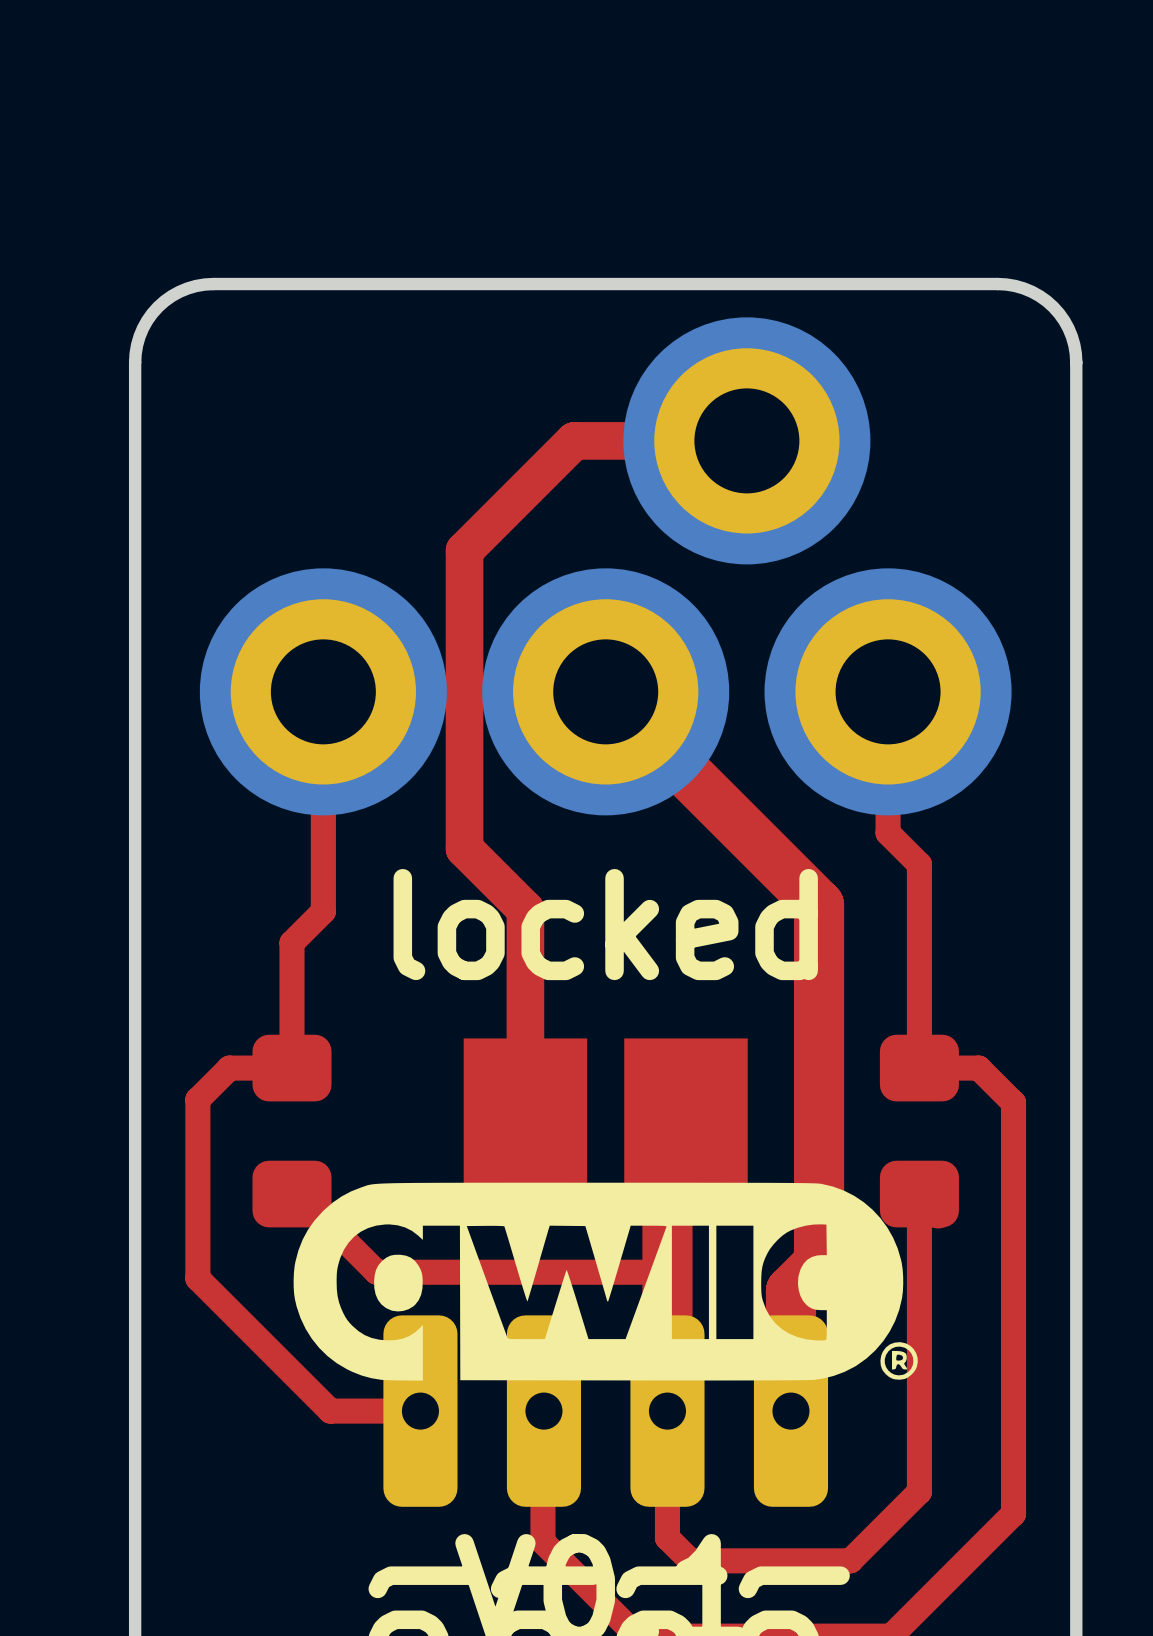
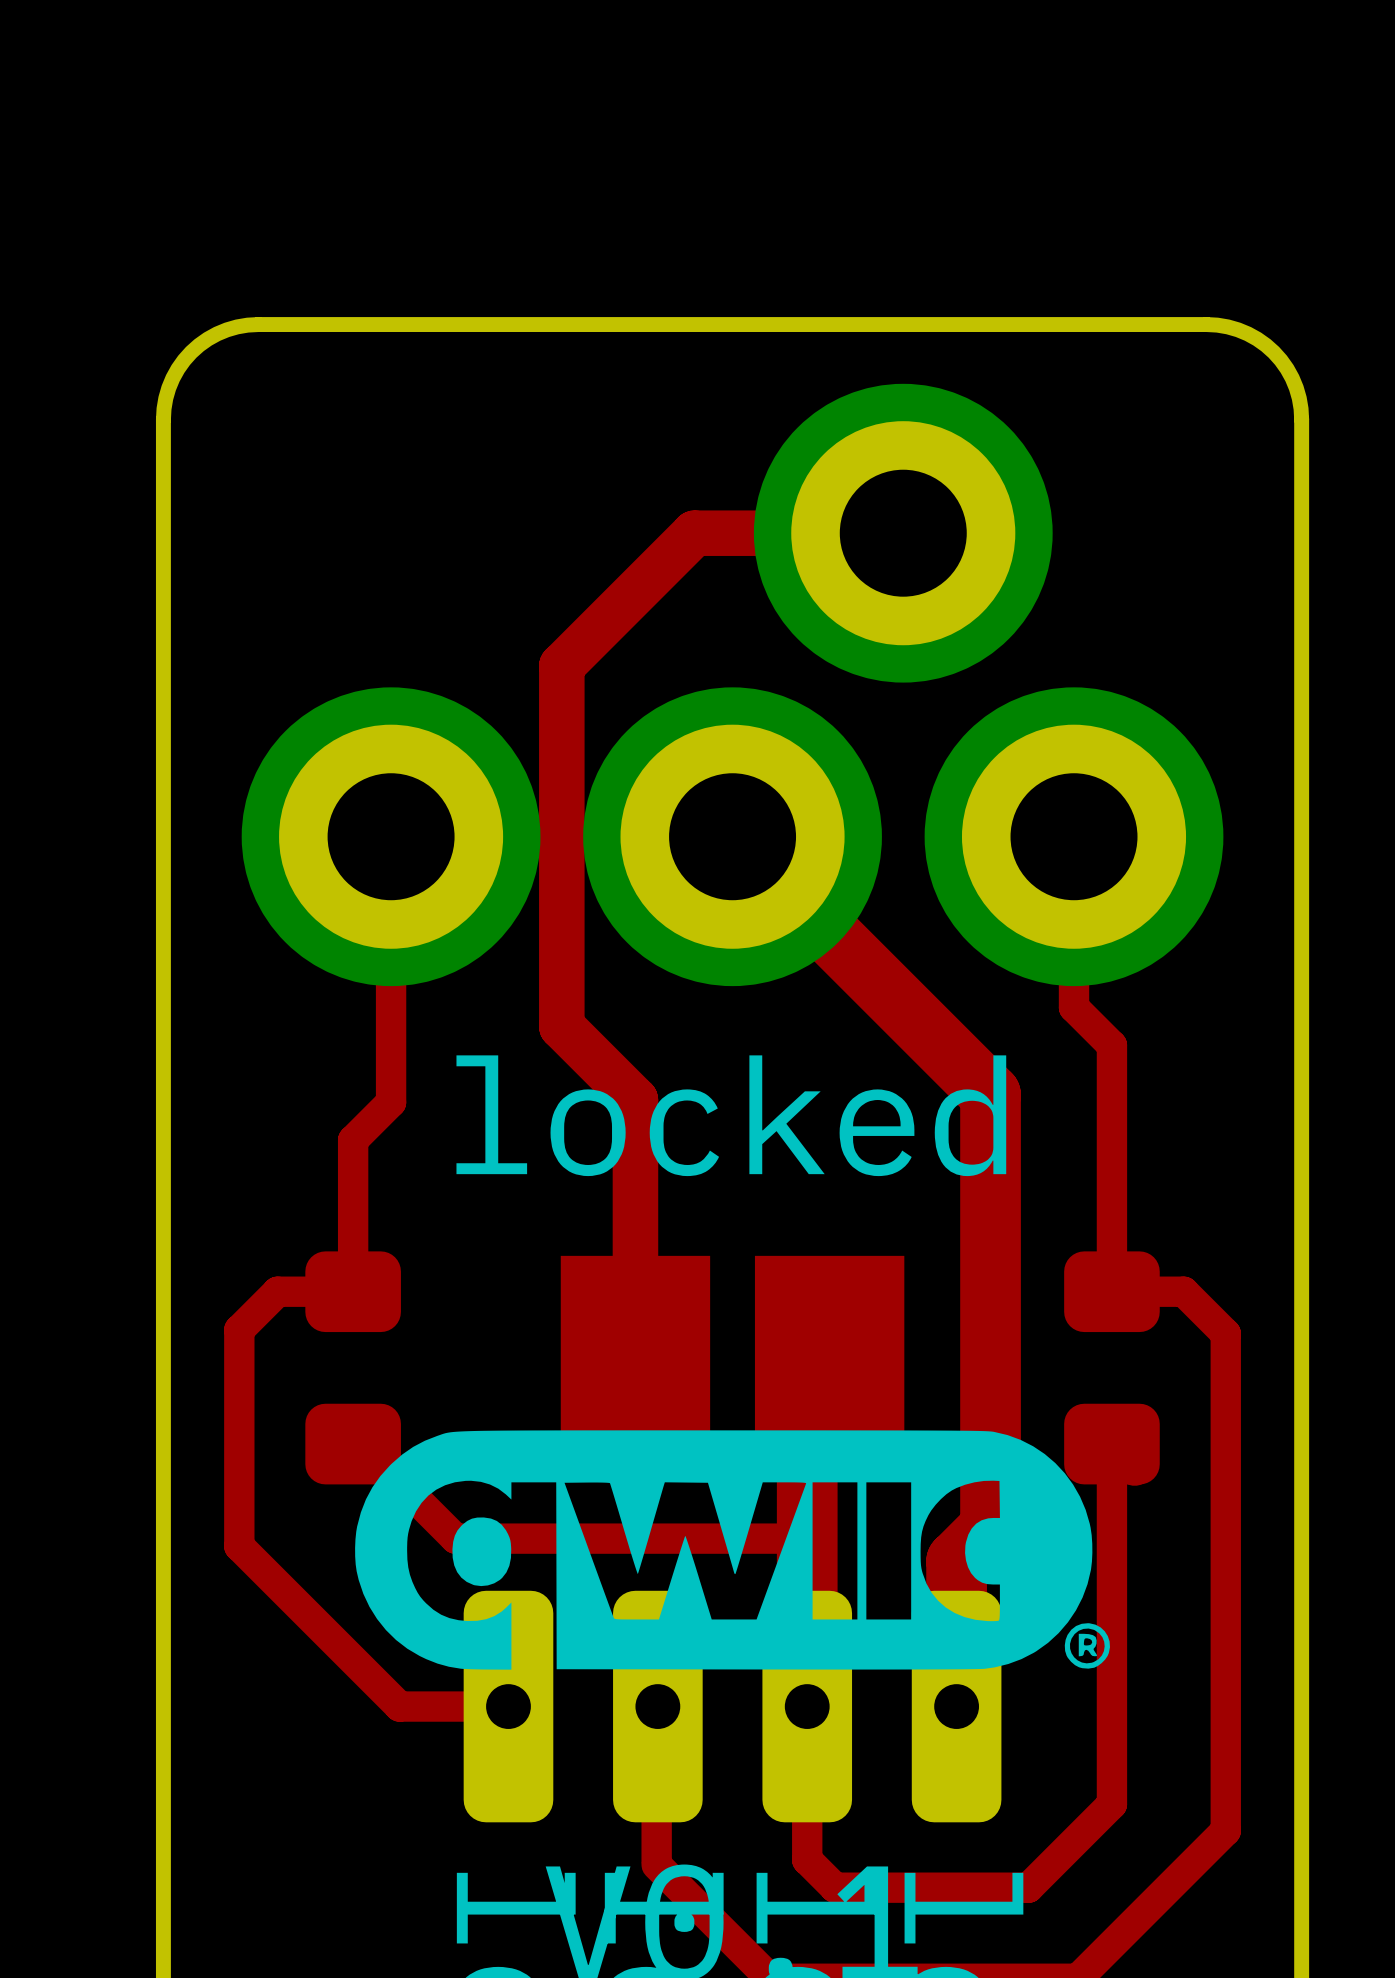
board edge: (1076, 362) (1071, 336) (1064, 320) (1053, 307) (1031, 291) (1015, 285) (997, 284) (204, 284) (179, 291) (158, 307) (142, 328) (137, 345) (135, 362) -> (1301, 438) (1299, 398) (1292, 378) (1280, 360) (1265, 345) (1247, 333) (1227, 326) (1206, 324) (247, 325) (217, 333) (199, 345) (184, 360) (172, 378) (165, 398) (163, 438)

